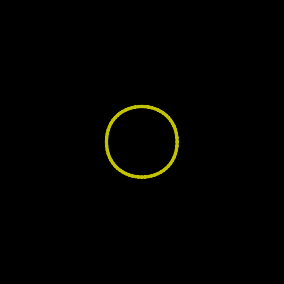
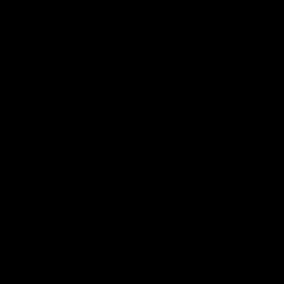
board edge: (141, 106) (125, 109) (115, 117) (108, 129) (106, 141) (108, 153) (115, 165) (125, 173) (141, 177) (157, 173) (168, 165) (175, 153) (177, 141) (175, 129) (168, 117) (157, 109) (141, 106) -> none

